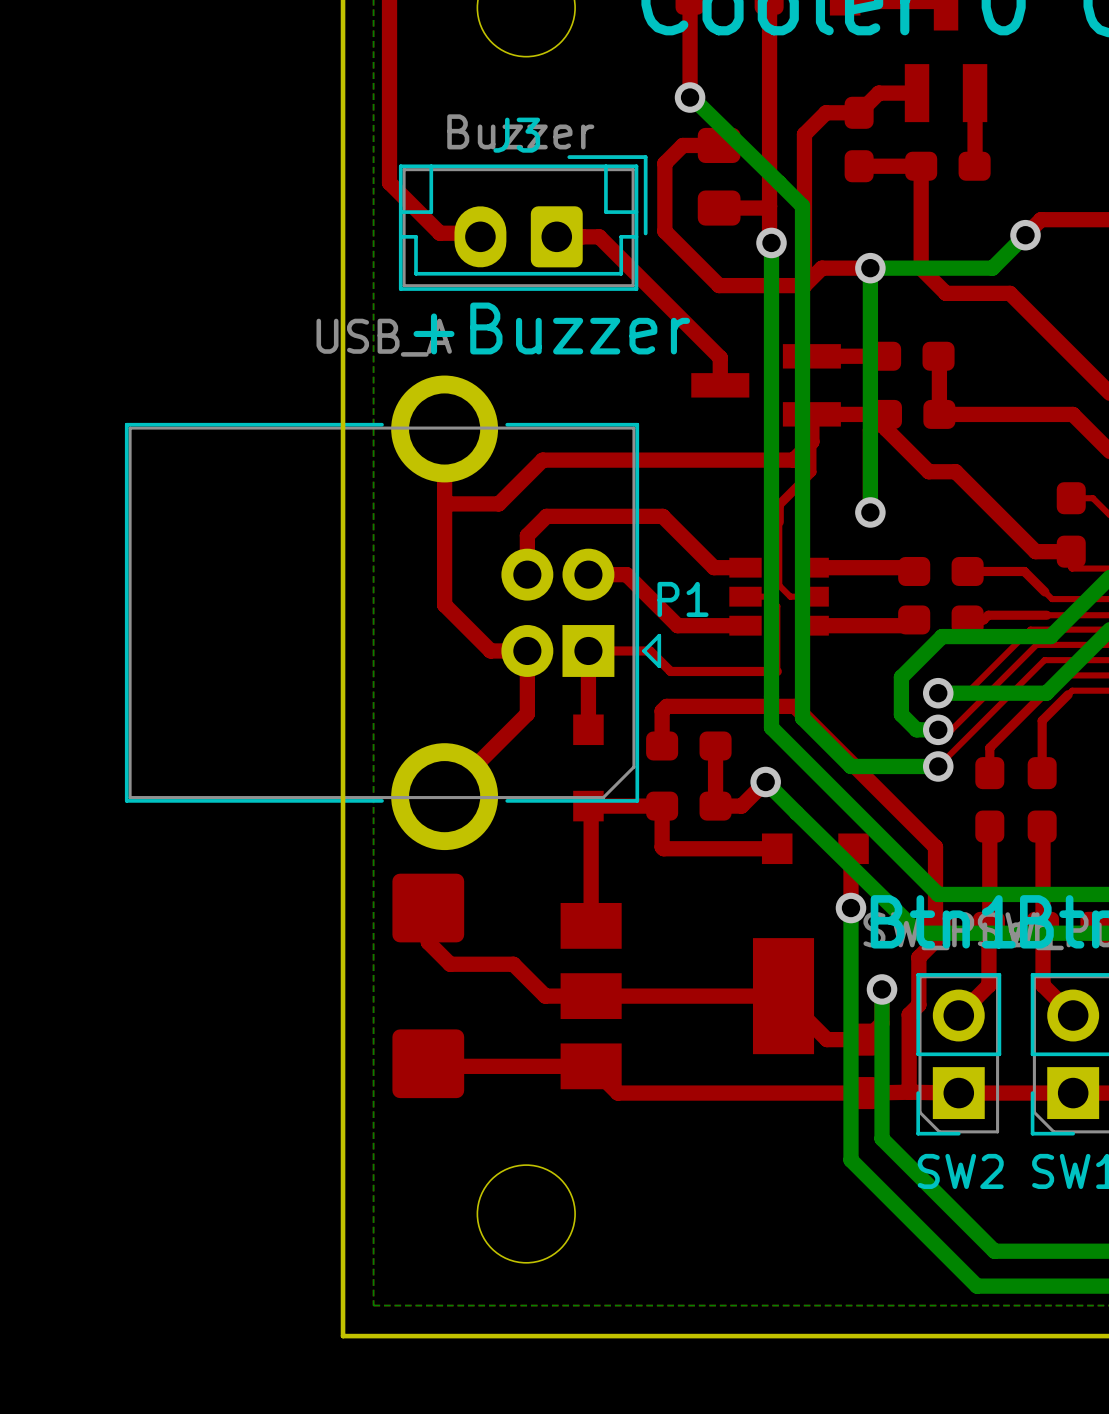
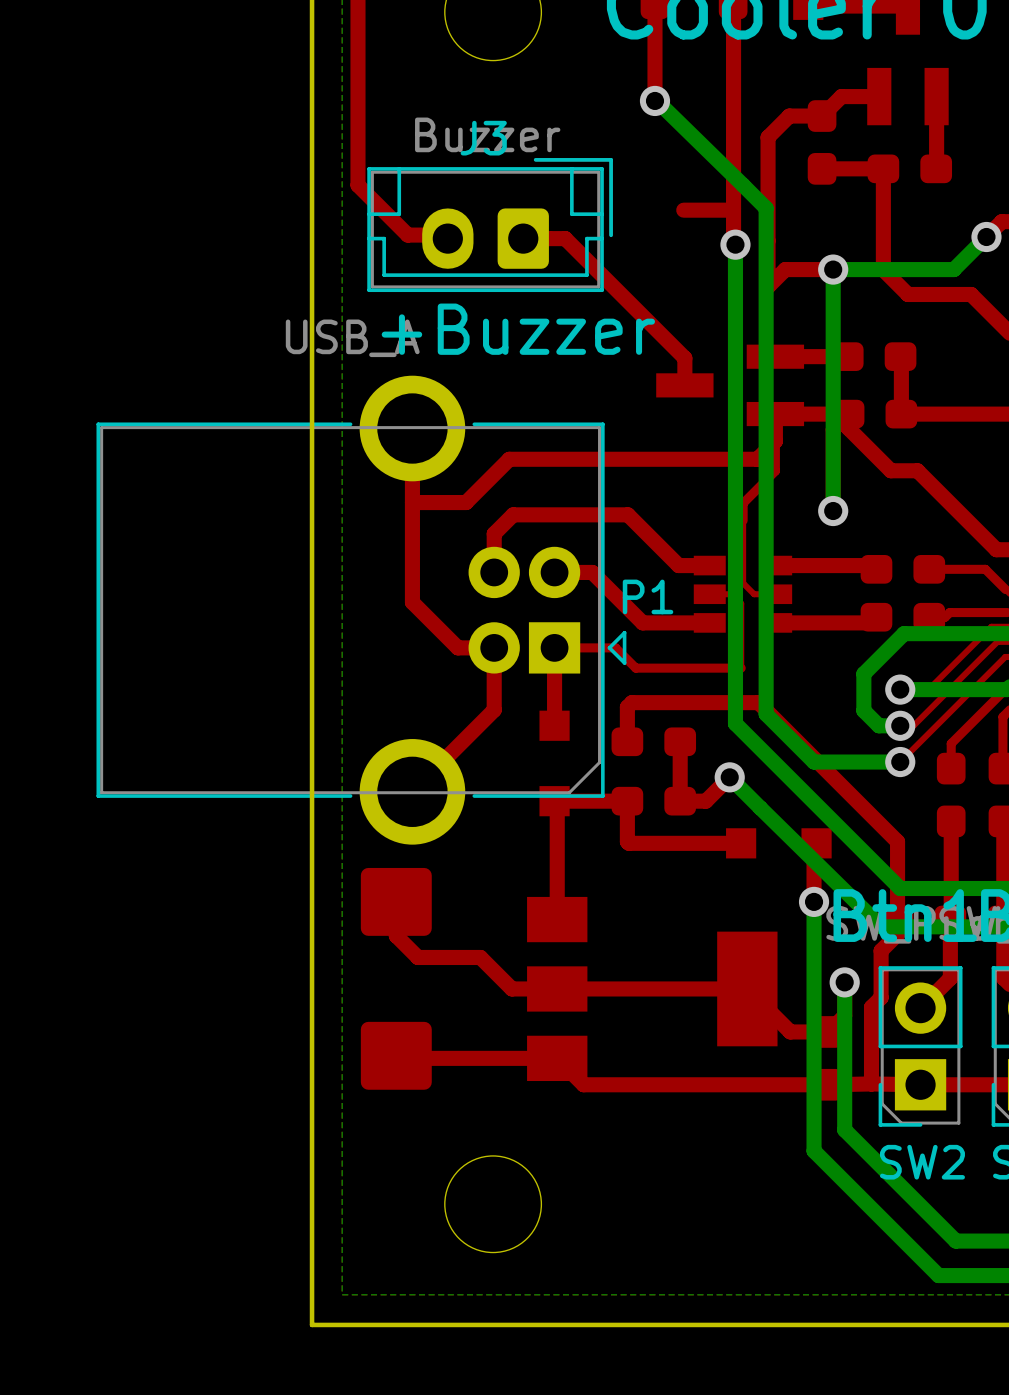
top track: (719, 145) (682, 145) (664, 163) (664, 231) (719, 285) (804, 285) -> none
part: (719, 176) -> none

